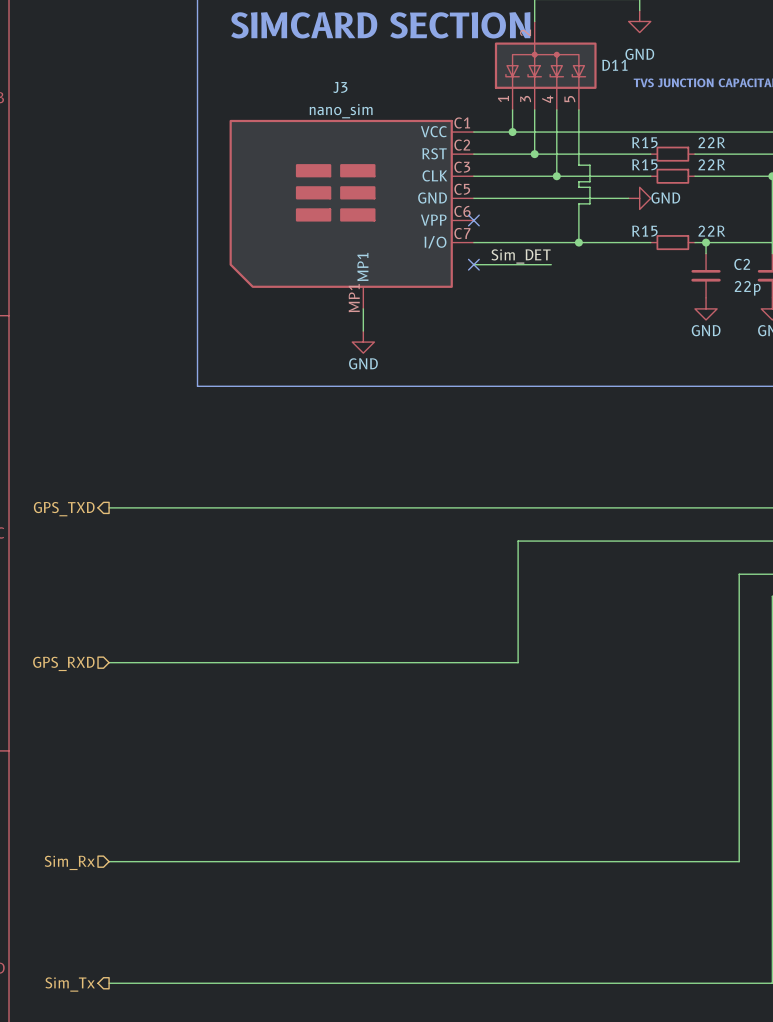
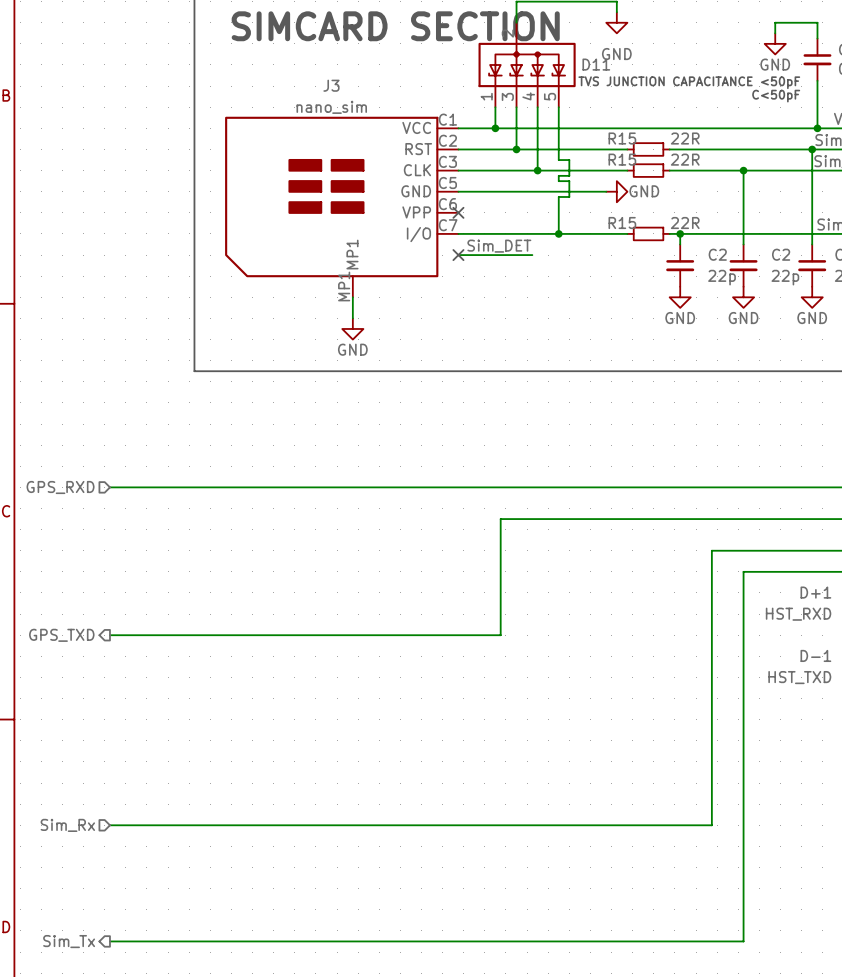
hierarchical label shape: output (64, 509) -> input (60, 487)
hierarchical label: GPS_TXD (64, 509) -> GPS_RXD (60, 487)
hierarchical label shape: input (63, 663) -> output (61, 635)
hierarchical label: GPS_RXD (63, 663) -> GPS_TXD (61, 635)

